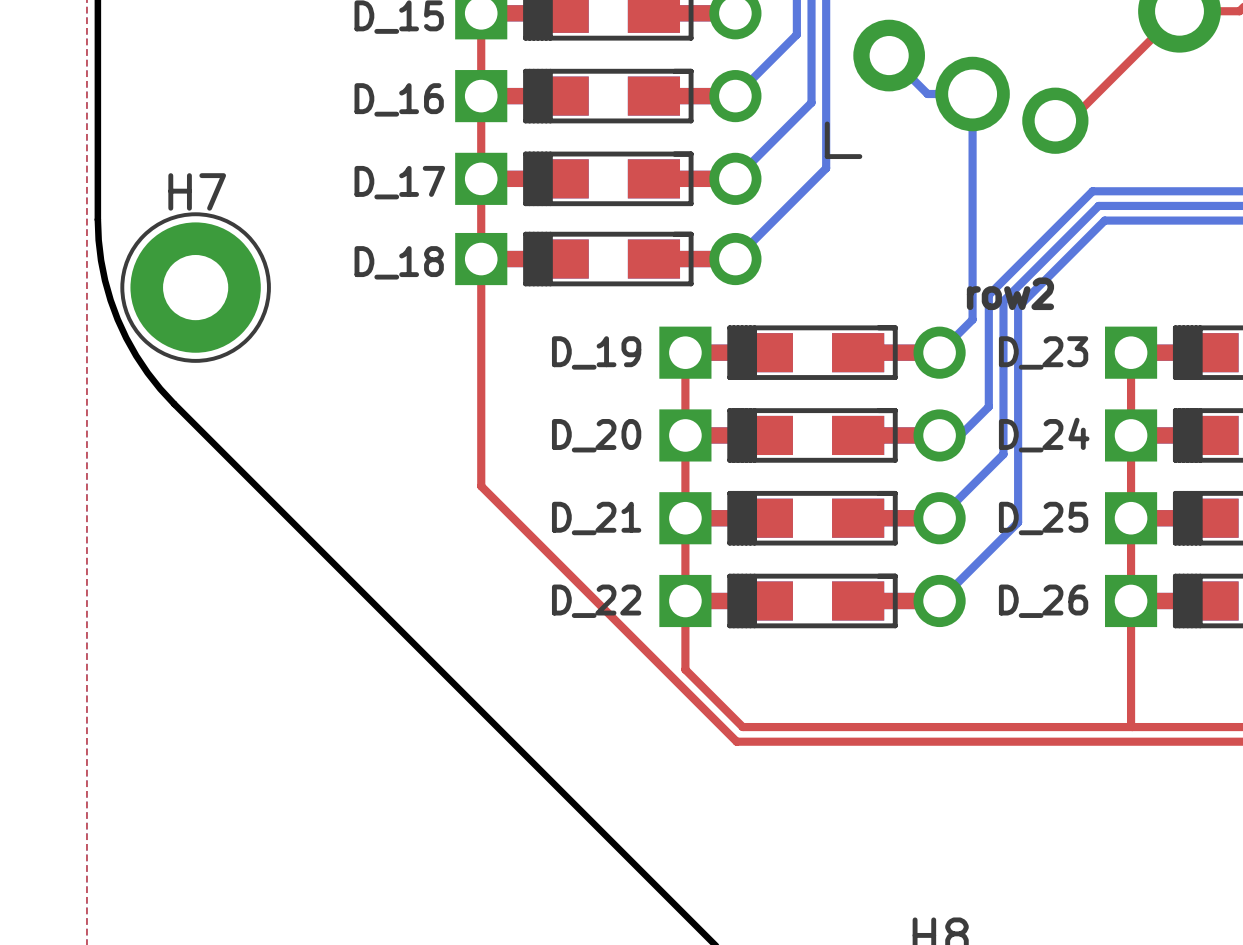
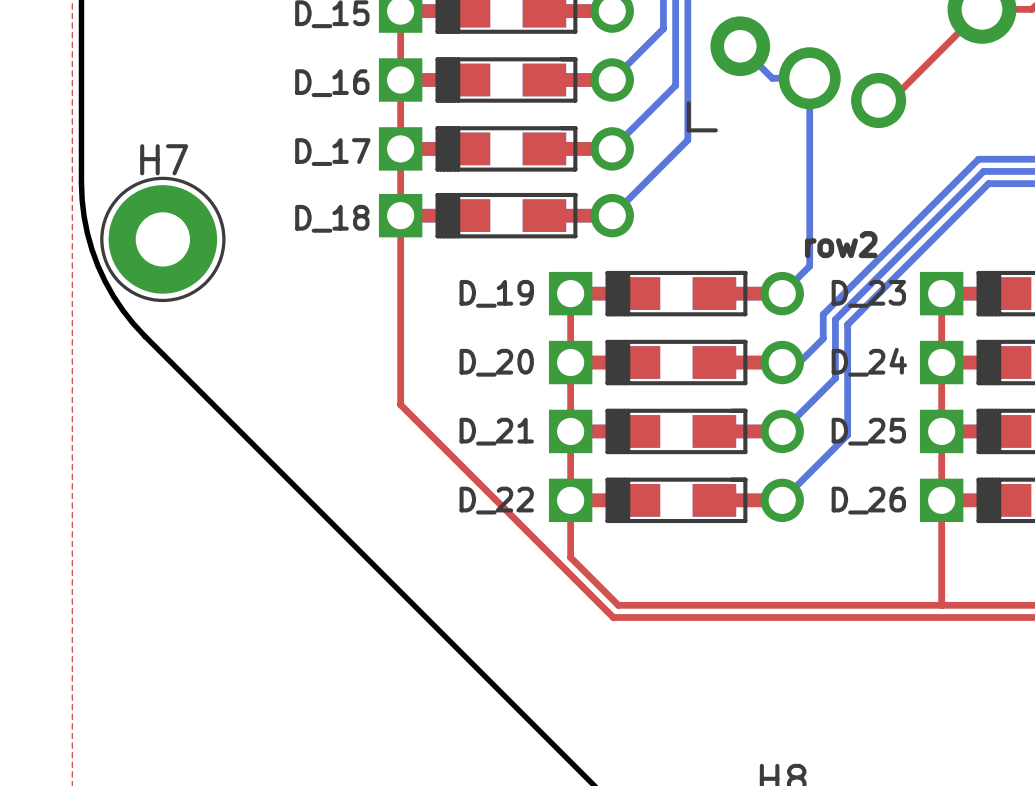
bottom track: (1175, 191) (1092, 191) (988, 295) (988, 377) -> (978, 159) (823, 314)
bottom track: (1181, 205) (1098, 205) (1003, 301) (1003, 383) -> (983, 171) (835, 319)
bottom track: (1187, 220) (1104, 220) (1018, 307) (1018, 389) -> (988, 183) (847, 324)

